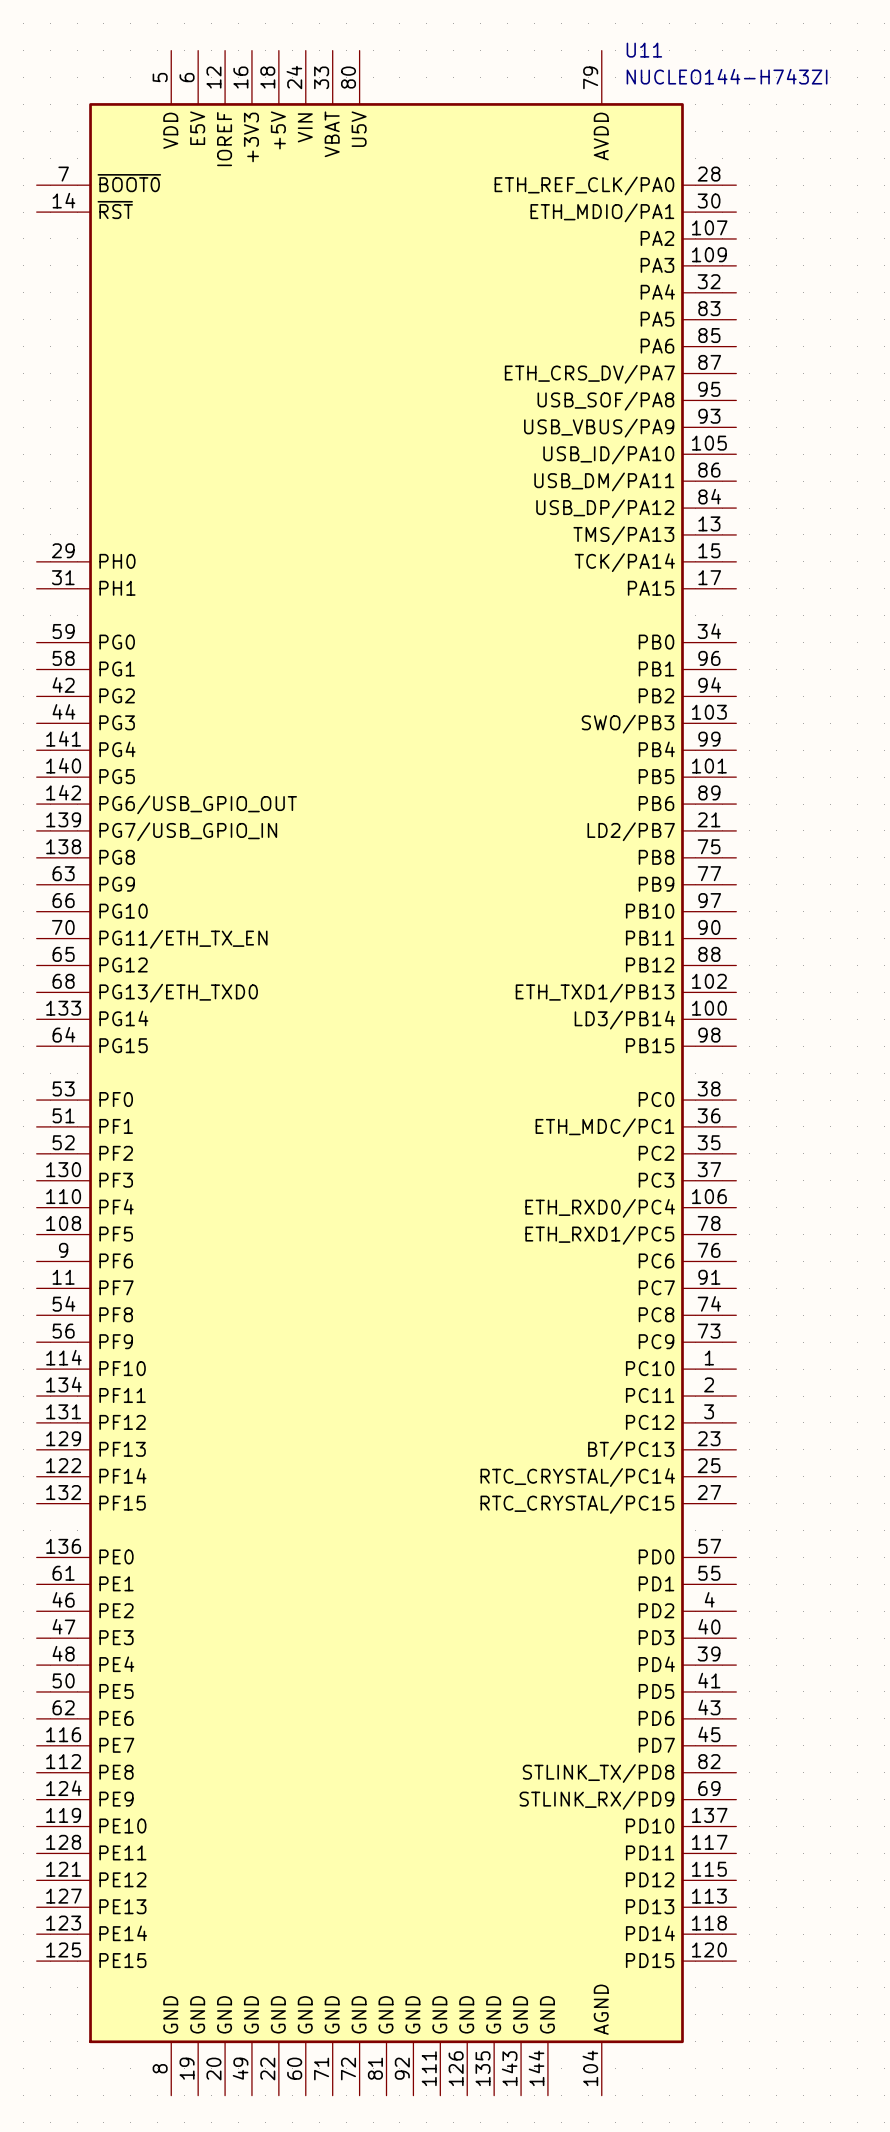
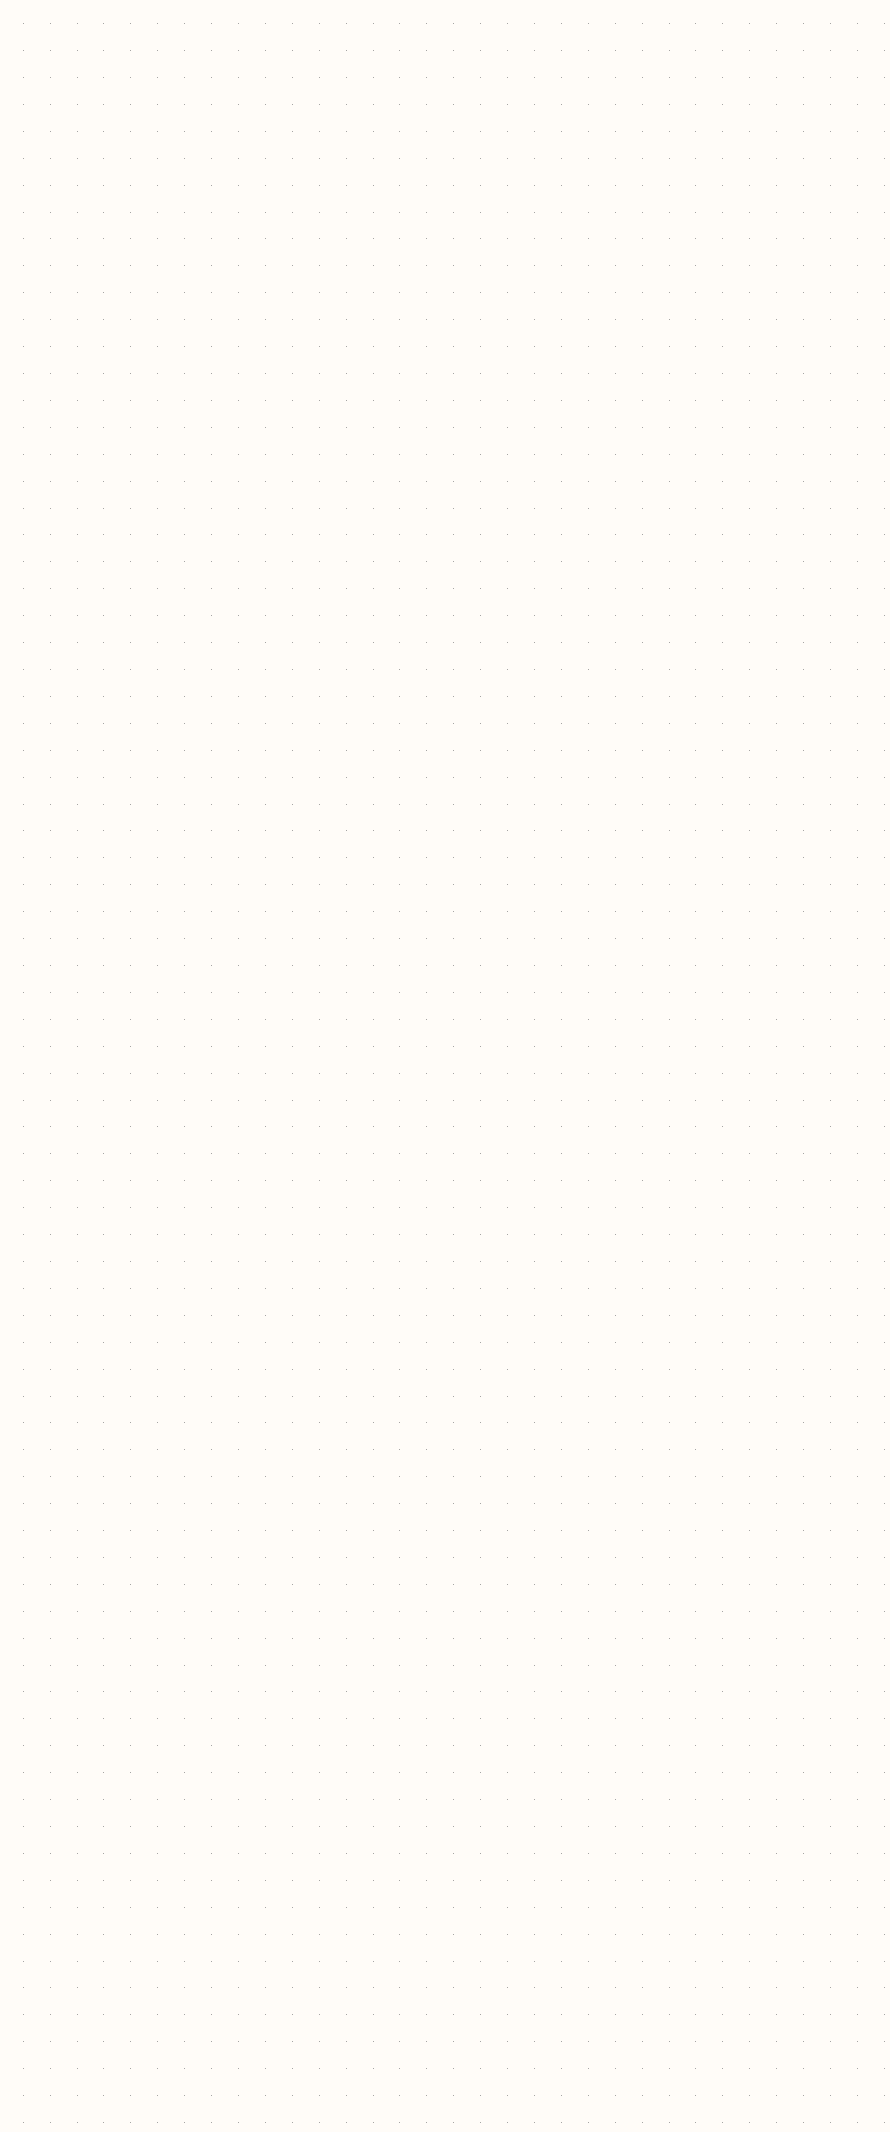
U11: NUCLEO144-H743ZI (386, 1073) -> none

